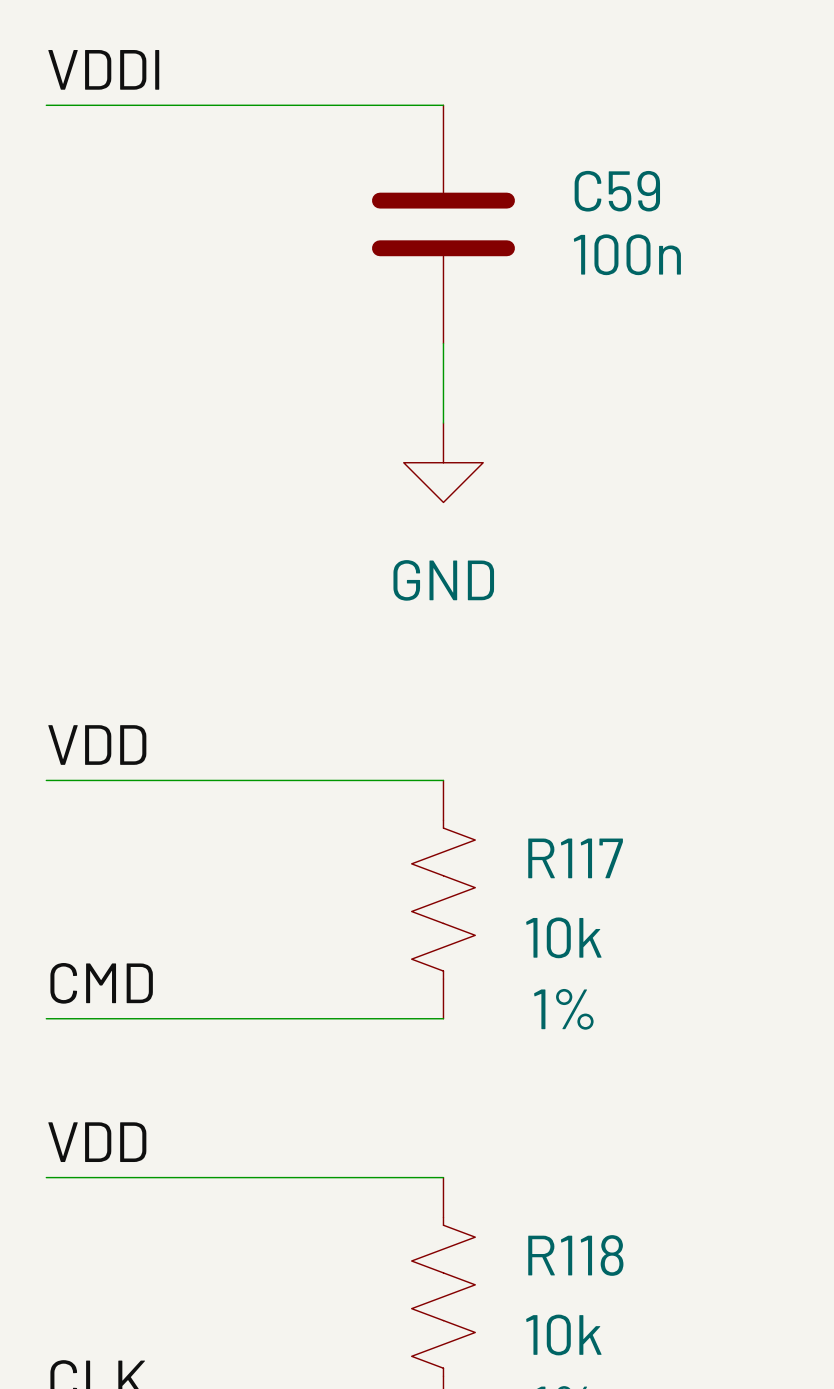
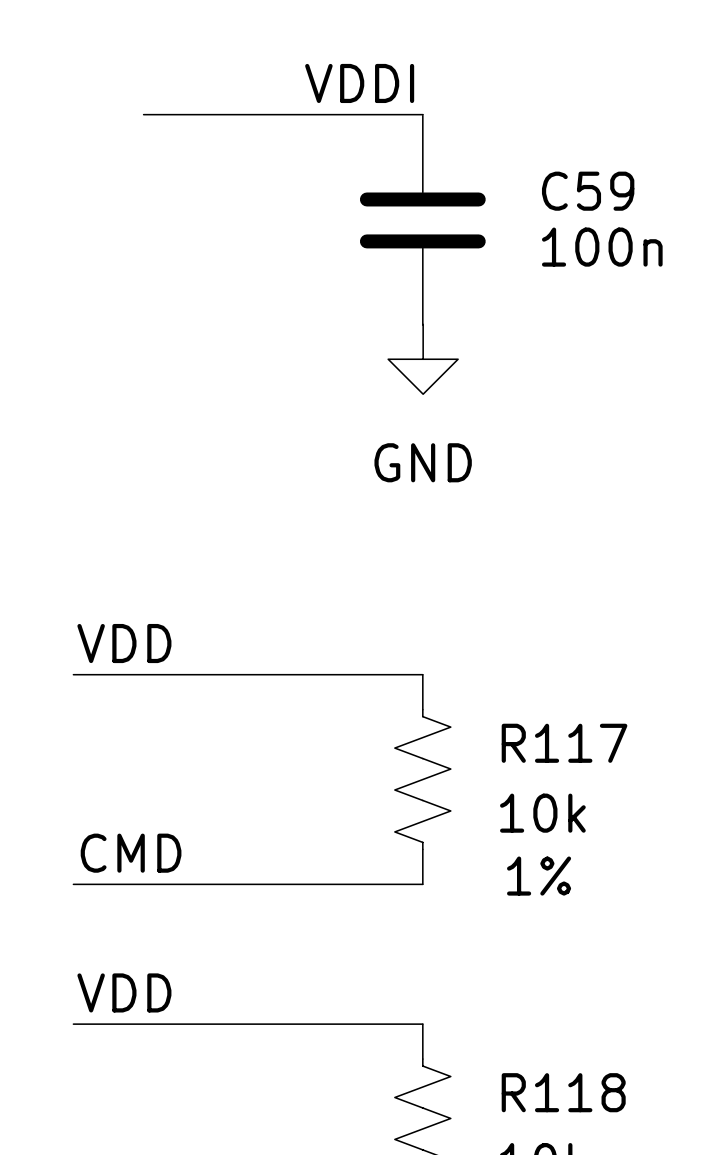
label position: VDDI (103, 69) -> VDDI (359, 83)
wire: (46, 105) (443, 105) -> none
wire: none -> (143, 114) (423, 114)
C59 position: (443, 224) -> (422, 220)
power symbol position: GND (443, 462) -> GND (423, 359)

